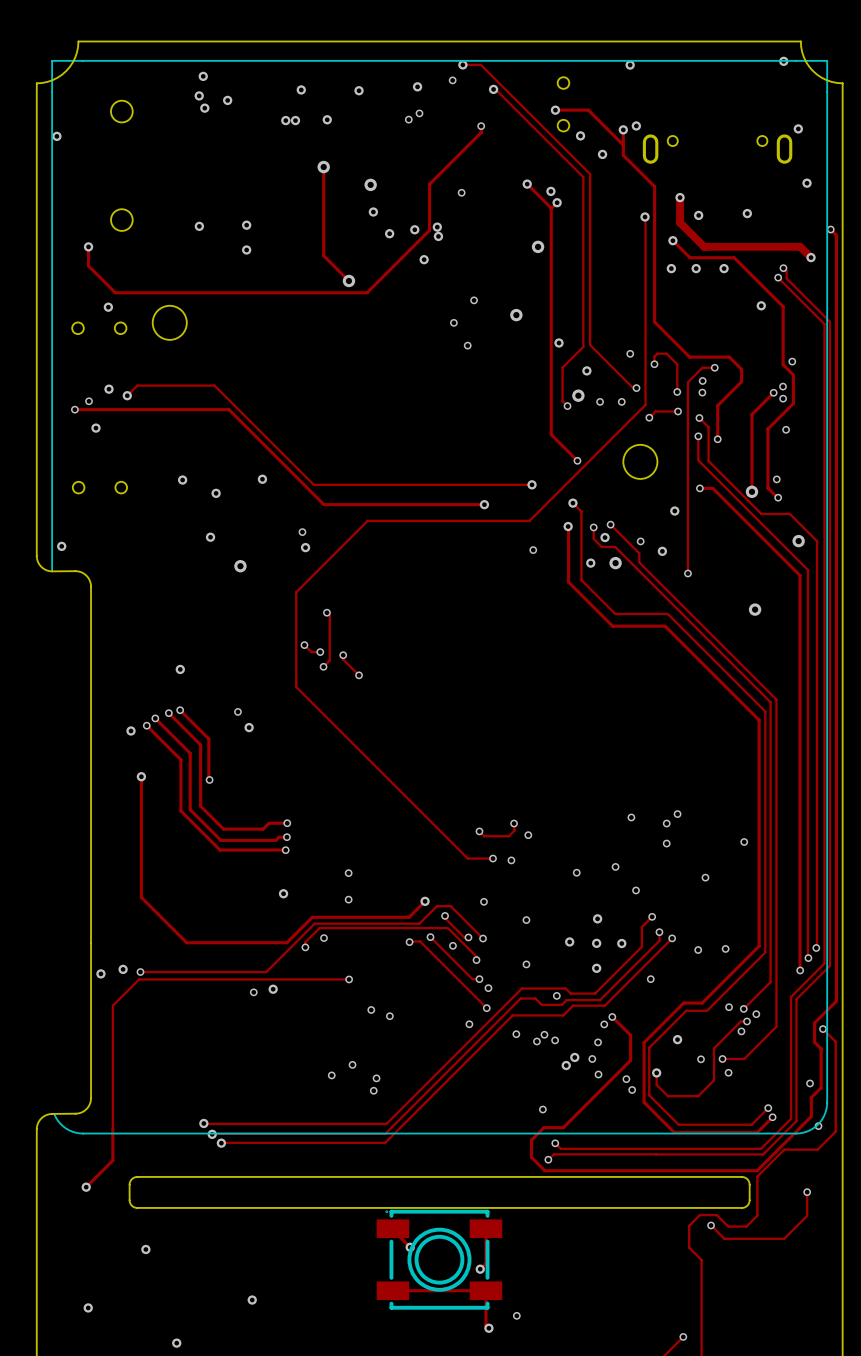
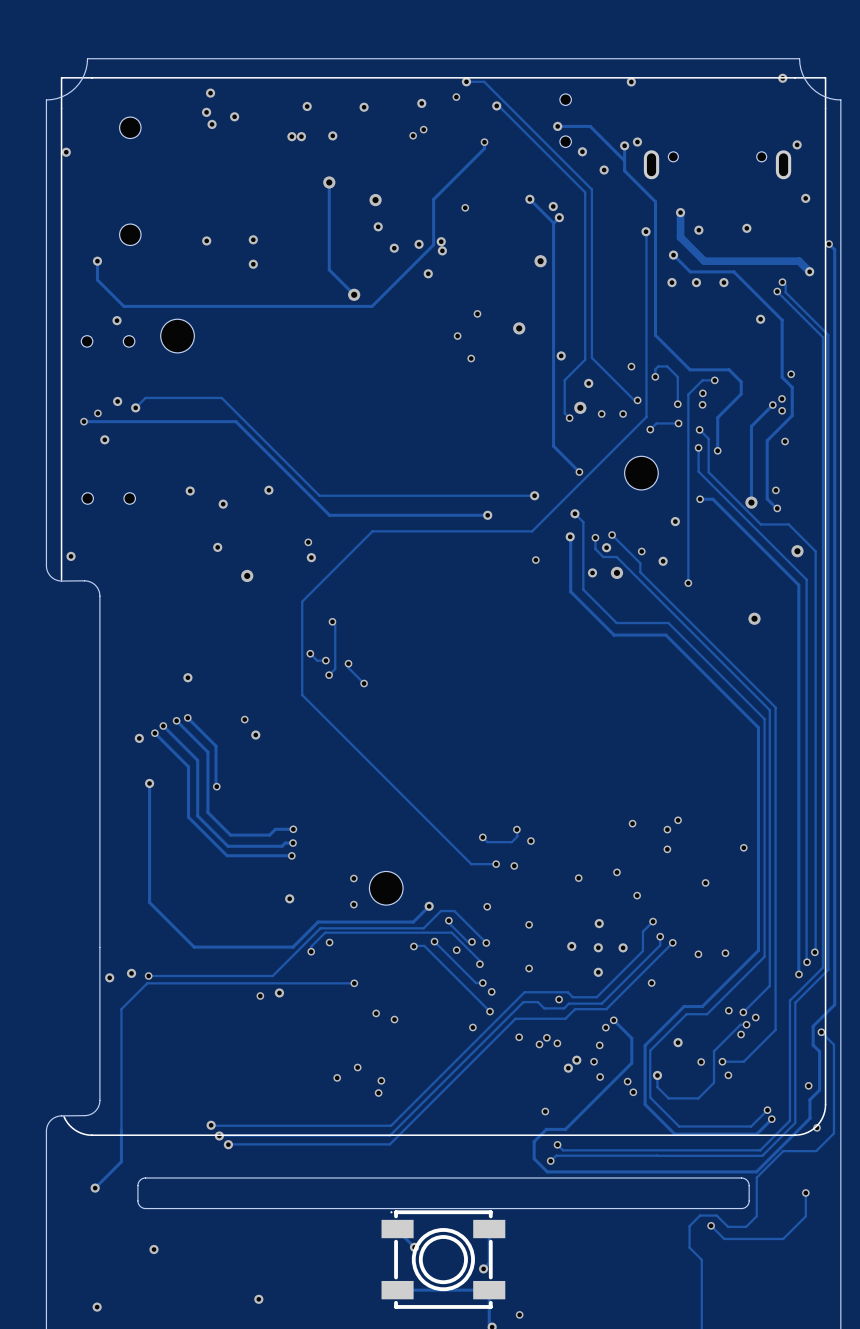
part: none -> (386, 888)

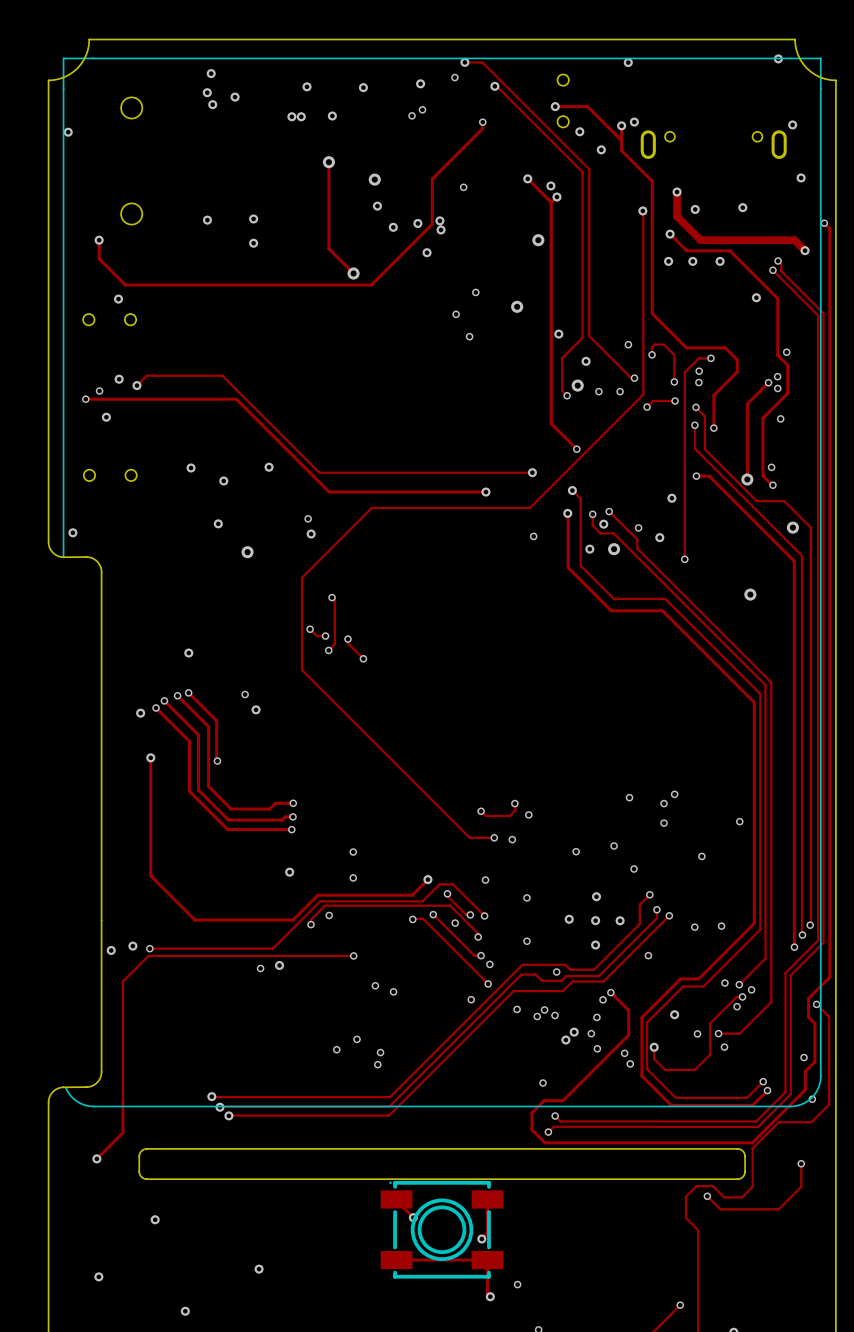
part: (177, 336) -> none
part: (641, 473) -> none
part: (386, 888) -> none

